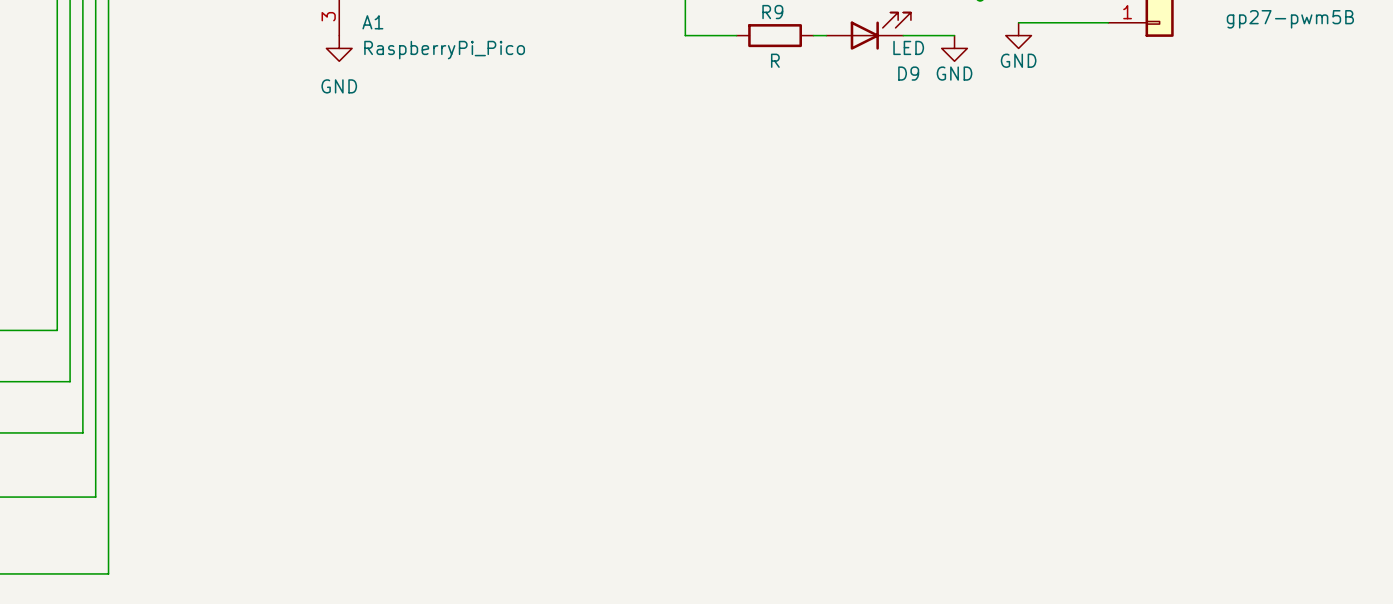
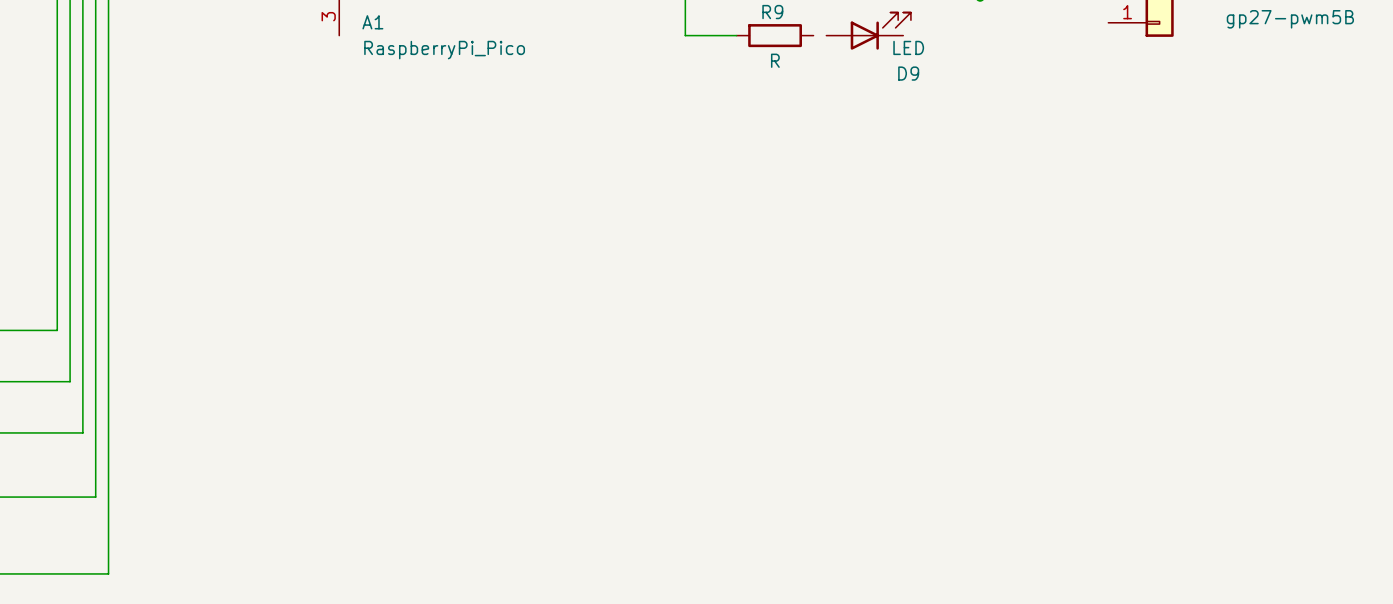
wire: (1018, 22) (1108, 22) -> none
wire: (813, 35) (826, 35) -> none
wire: (903, 35) (954, 35) -> none
power symbol: GND (1018, 35) -> none
power symbol: GND (339, 48) -> none
power symbol: GND (954, 48) -> none

